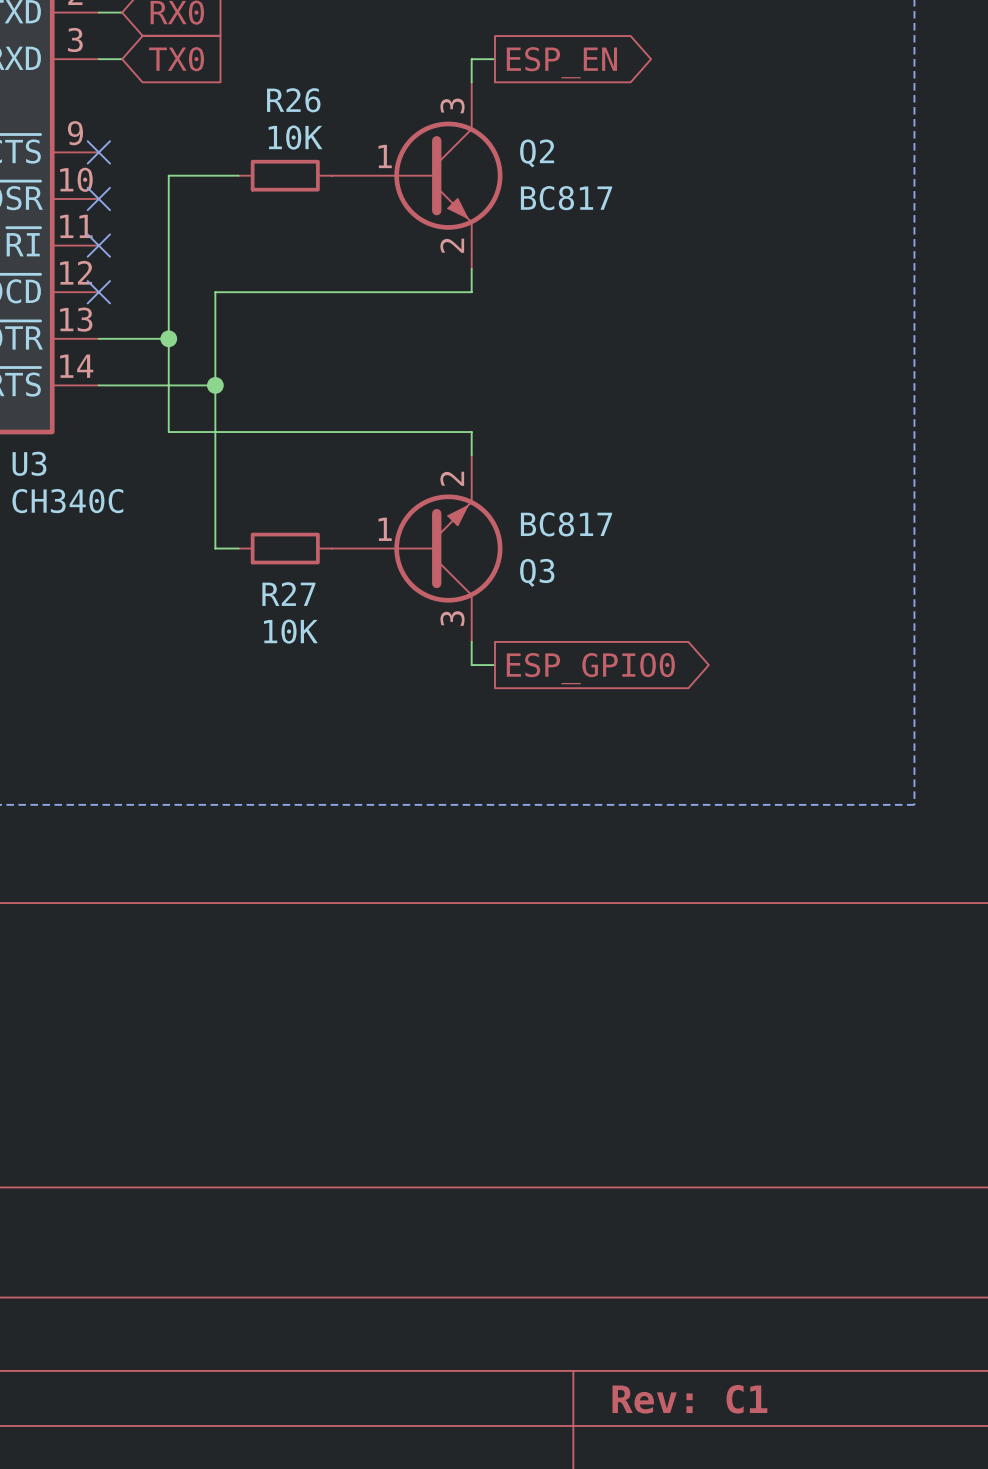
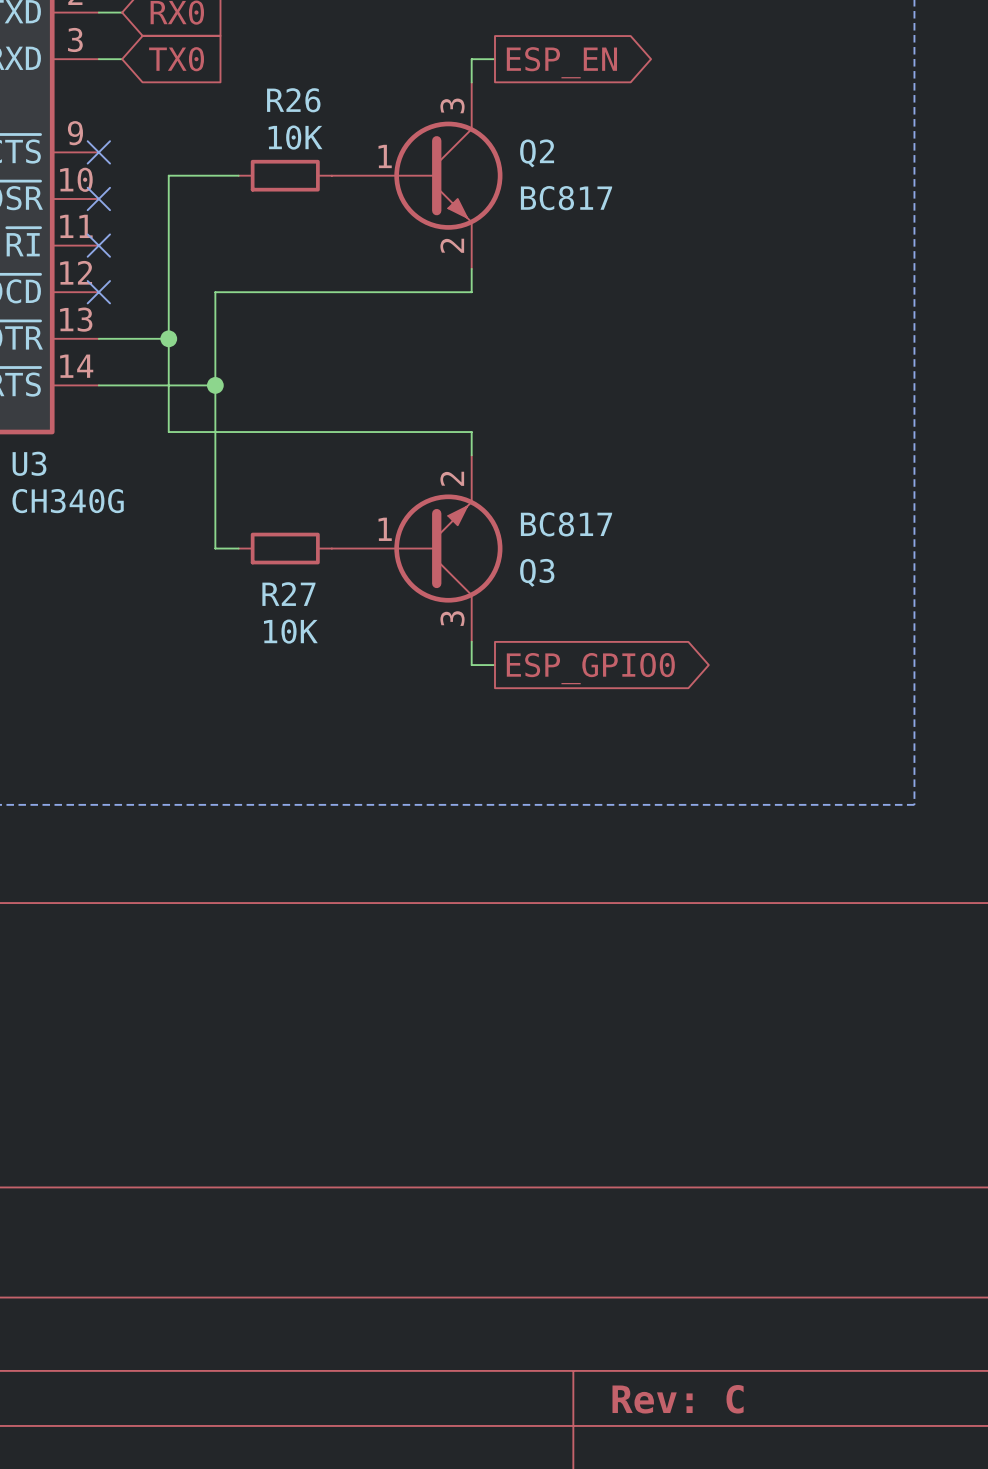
U3 value: CH340C (67, 501) -> CH340G (68, 501)
title block: Rev: C1 (689, 1399) -> Rev: C (678, 1399)

